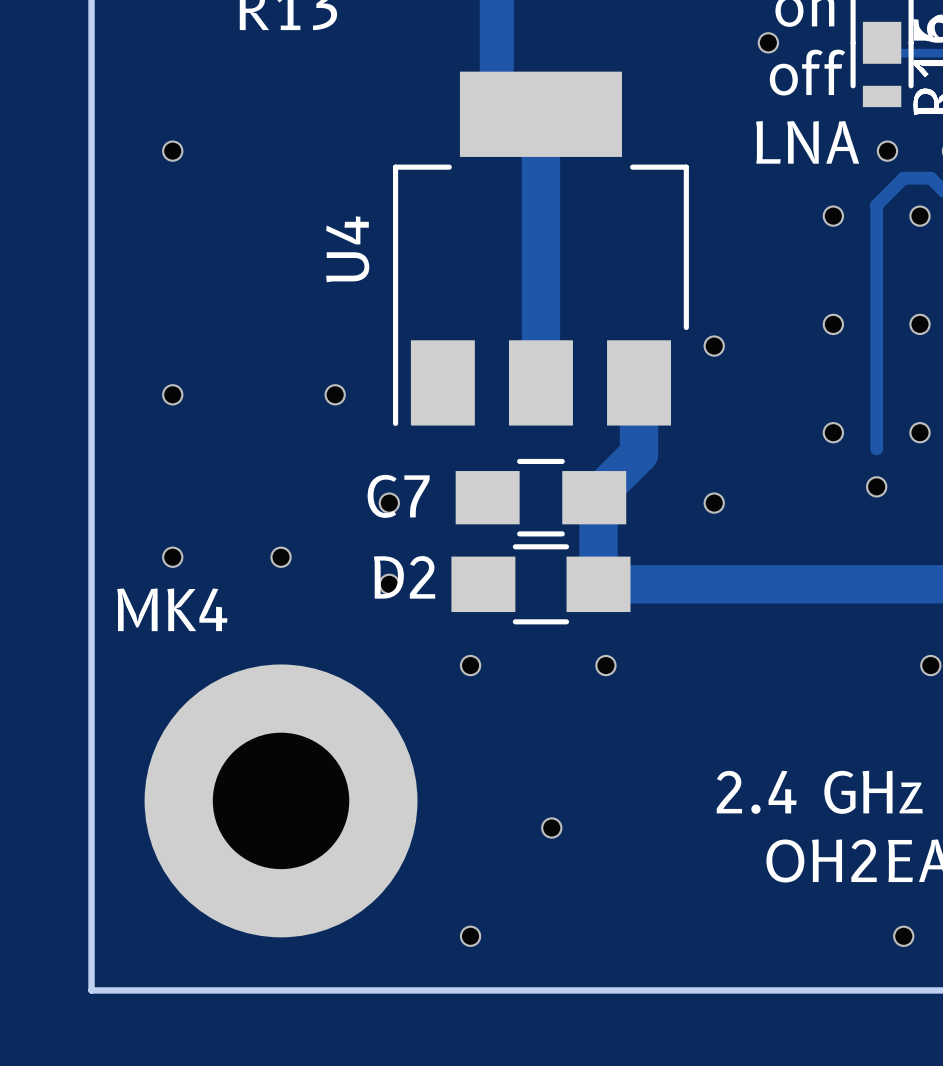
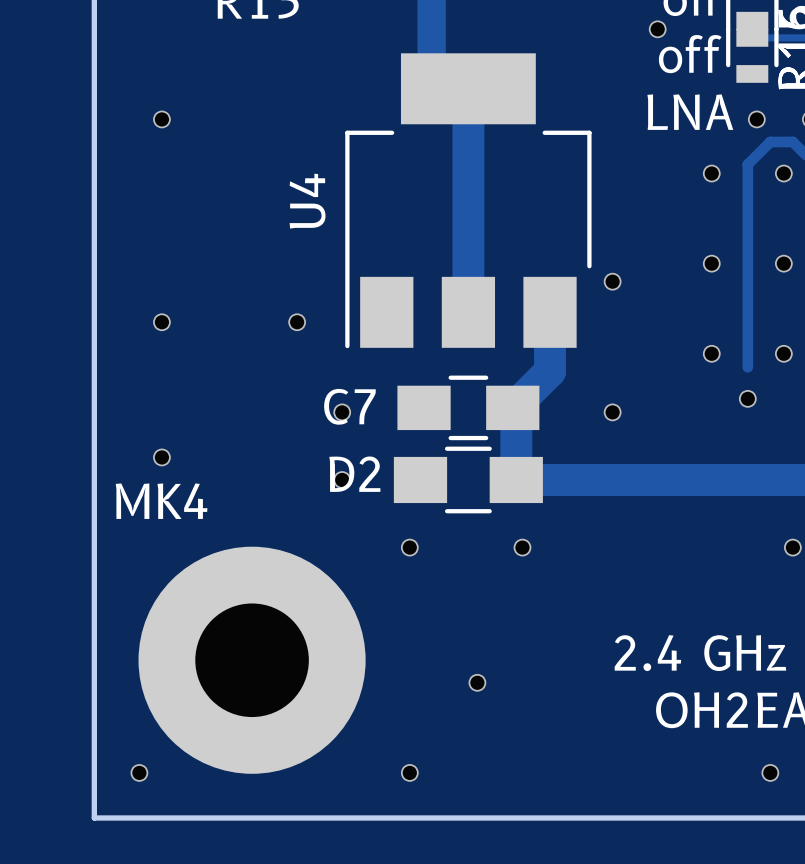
via: (281, 557) -> none
via: none -> (139, 772)

